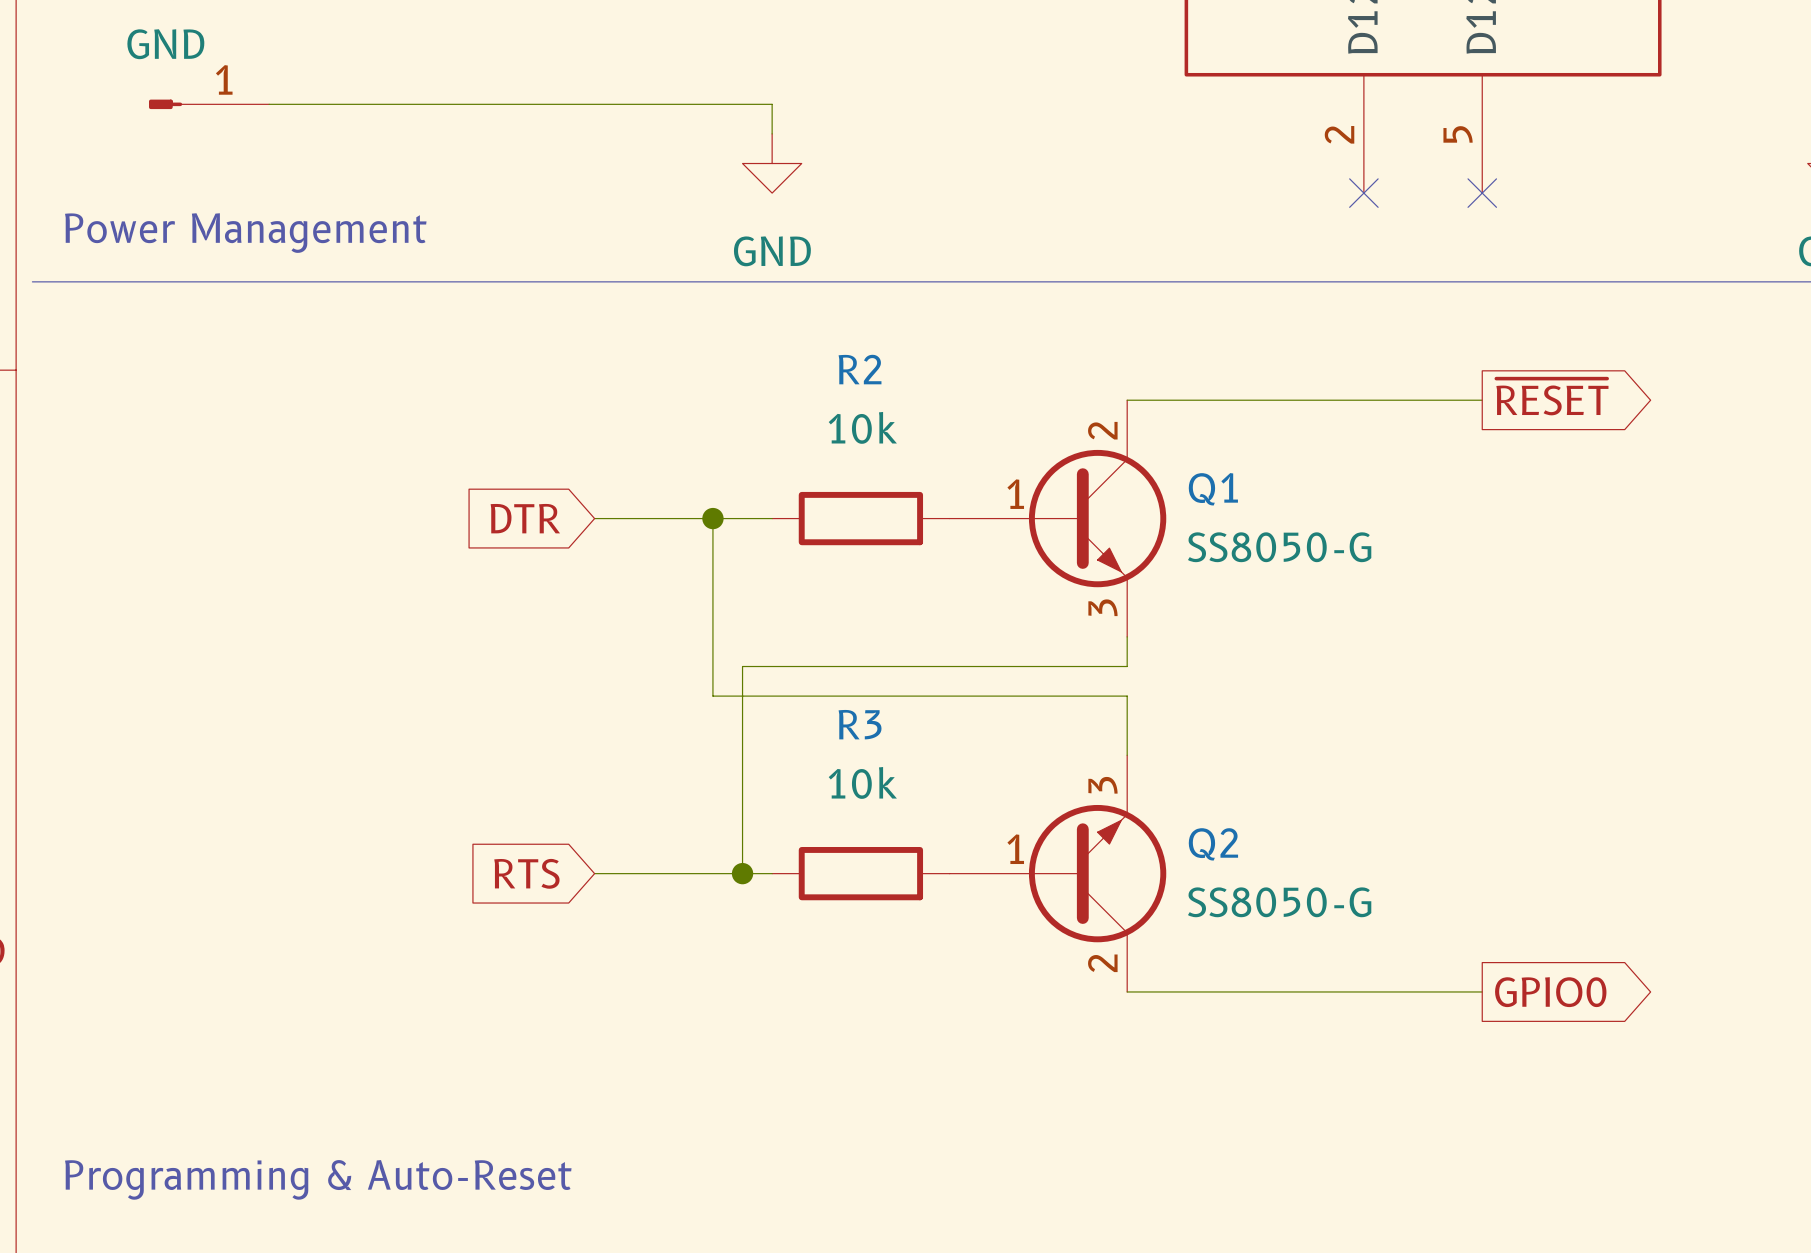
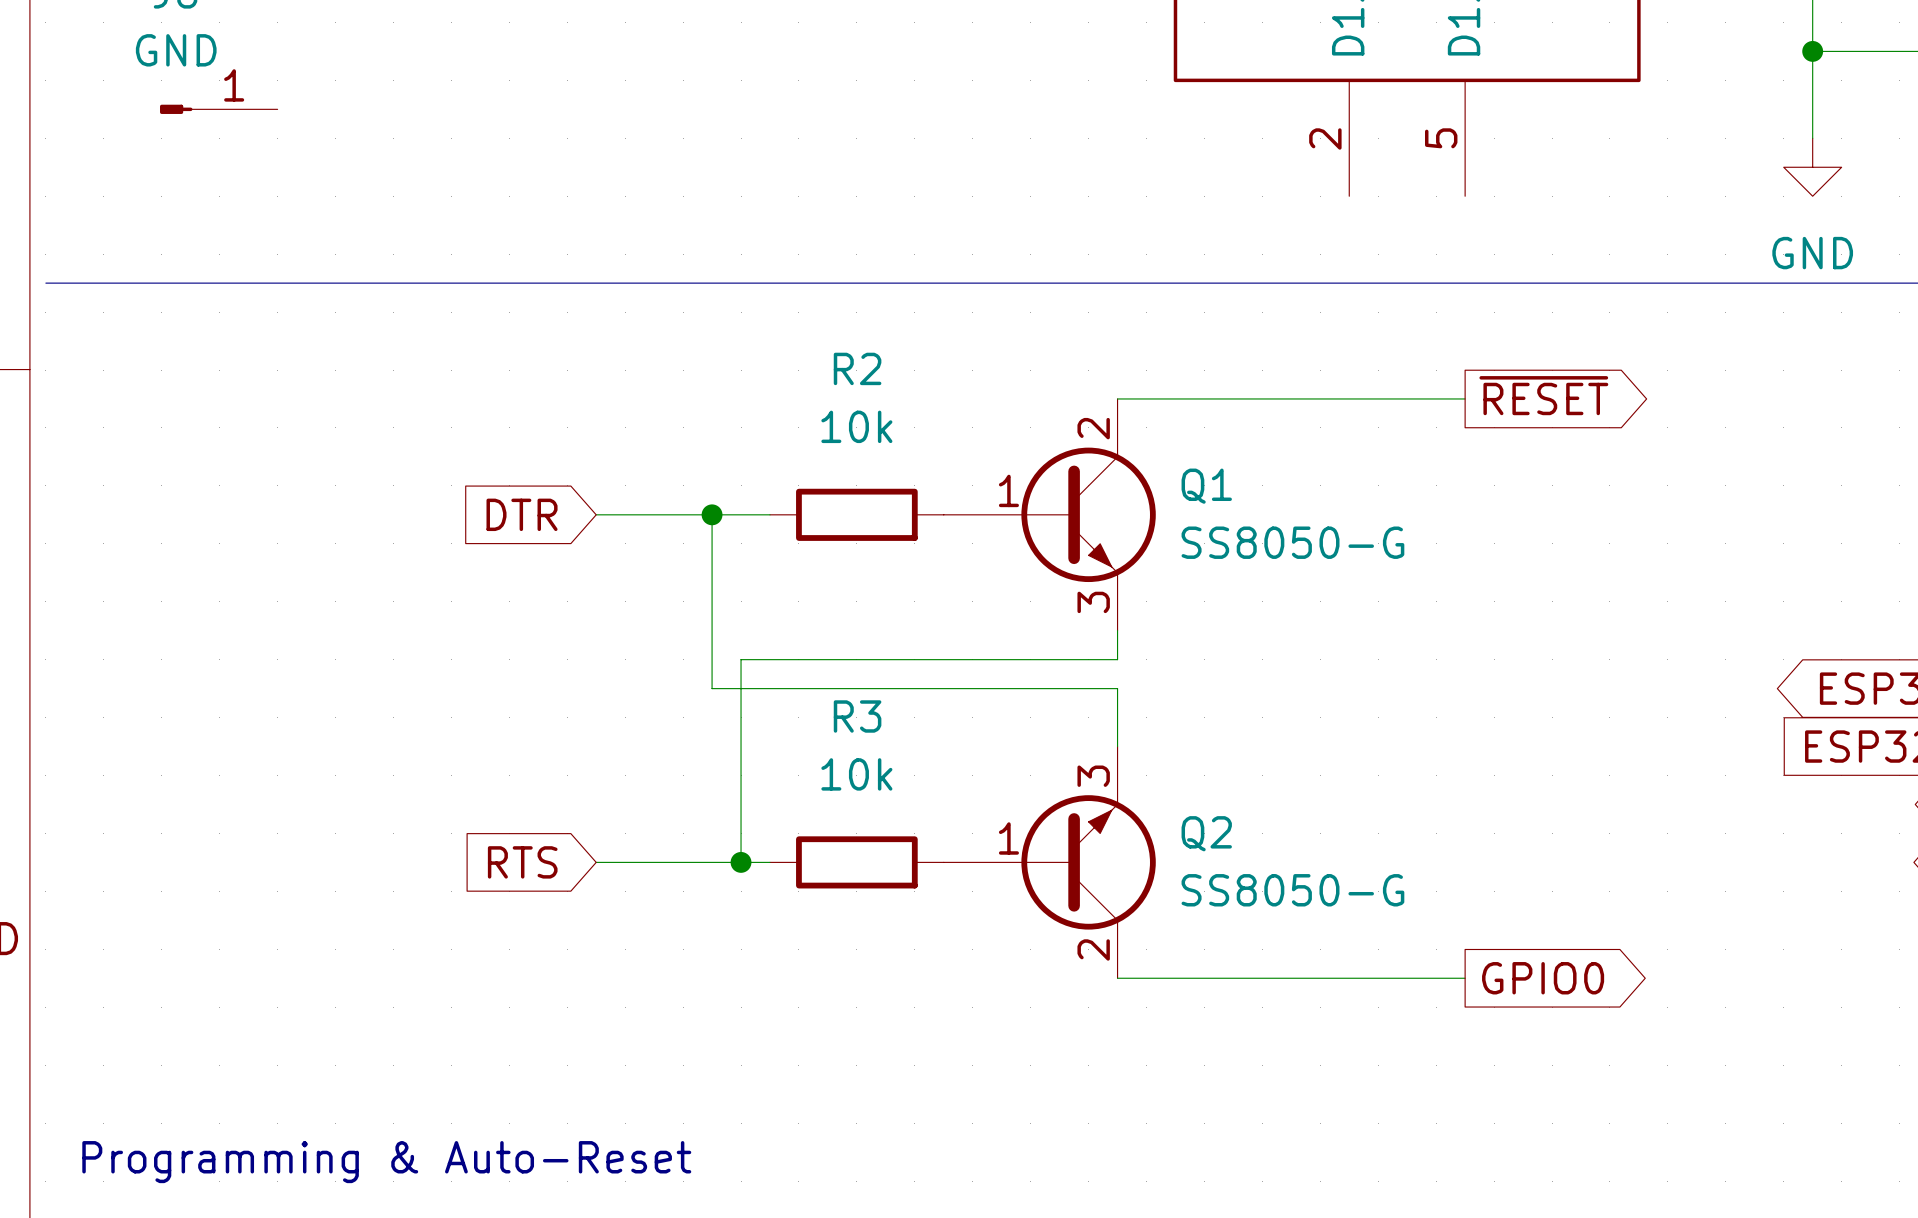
wire: (269, 104) (772, 104) (772, 133) -> none
power symbol: GND (772, 163) -> none
no-connect mark: (1363, 193) -> none
no-connect mark: (1482, 193) -> none
text: Power Management (245, 233) -> none

